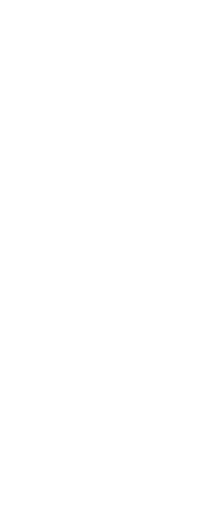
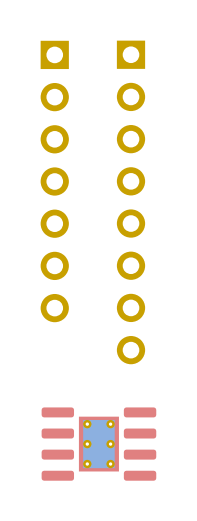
part: none -> (54, 181)
part: none -> (131, 202)
part: none -> (98, 444)

